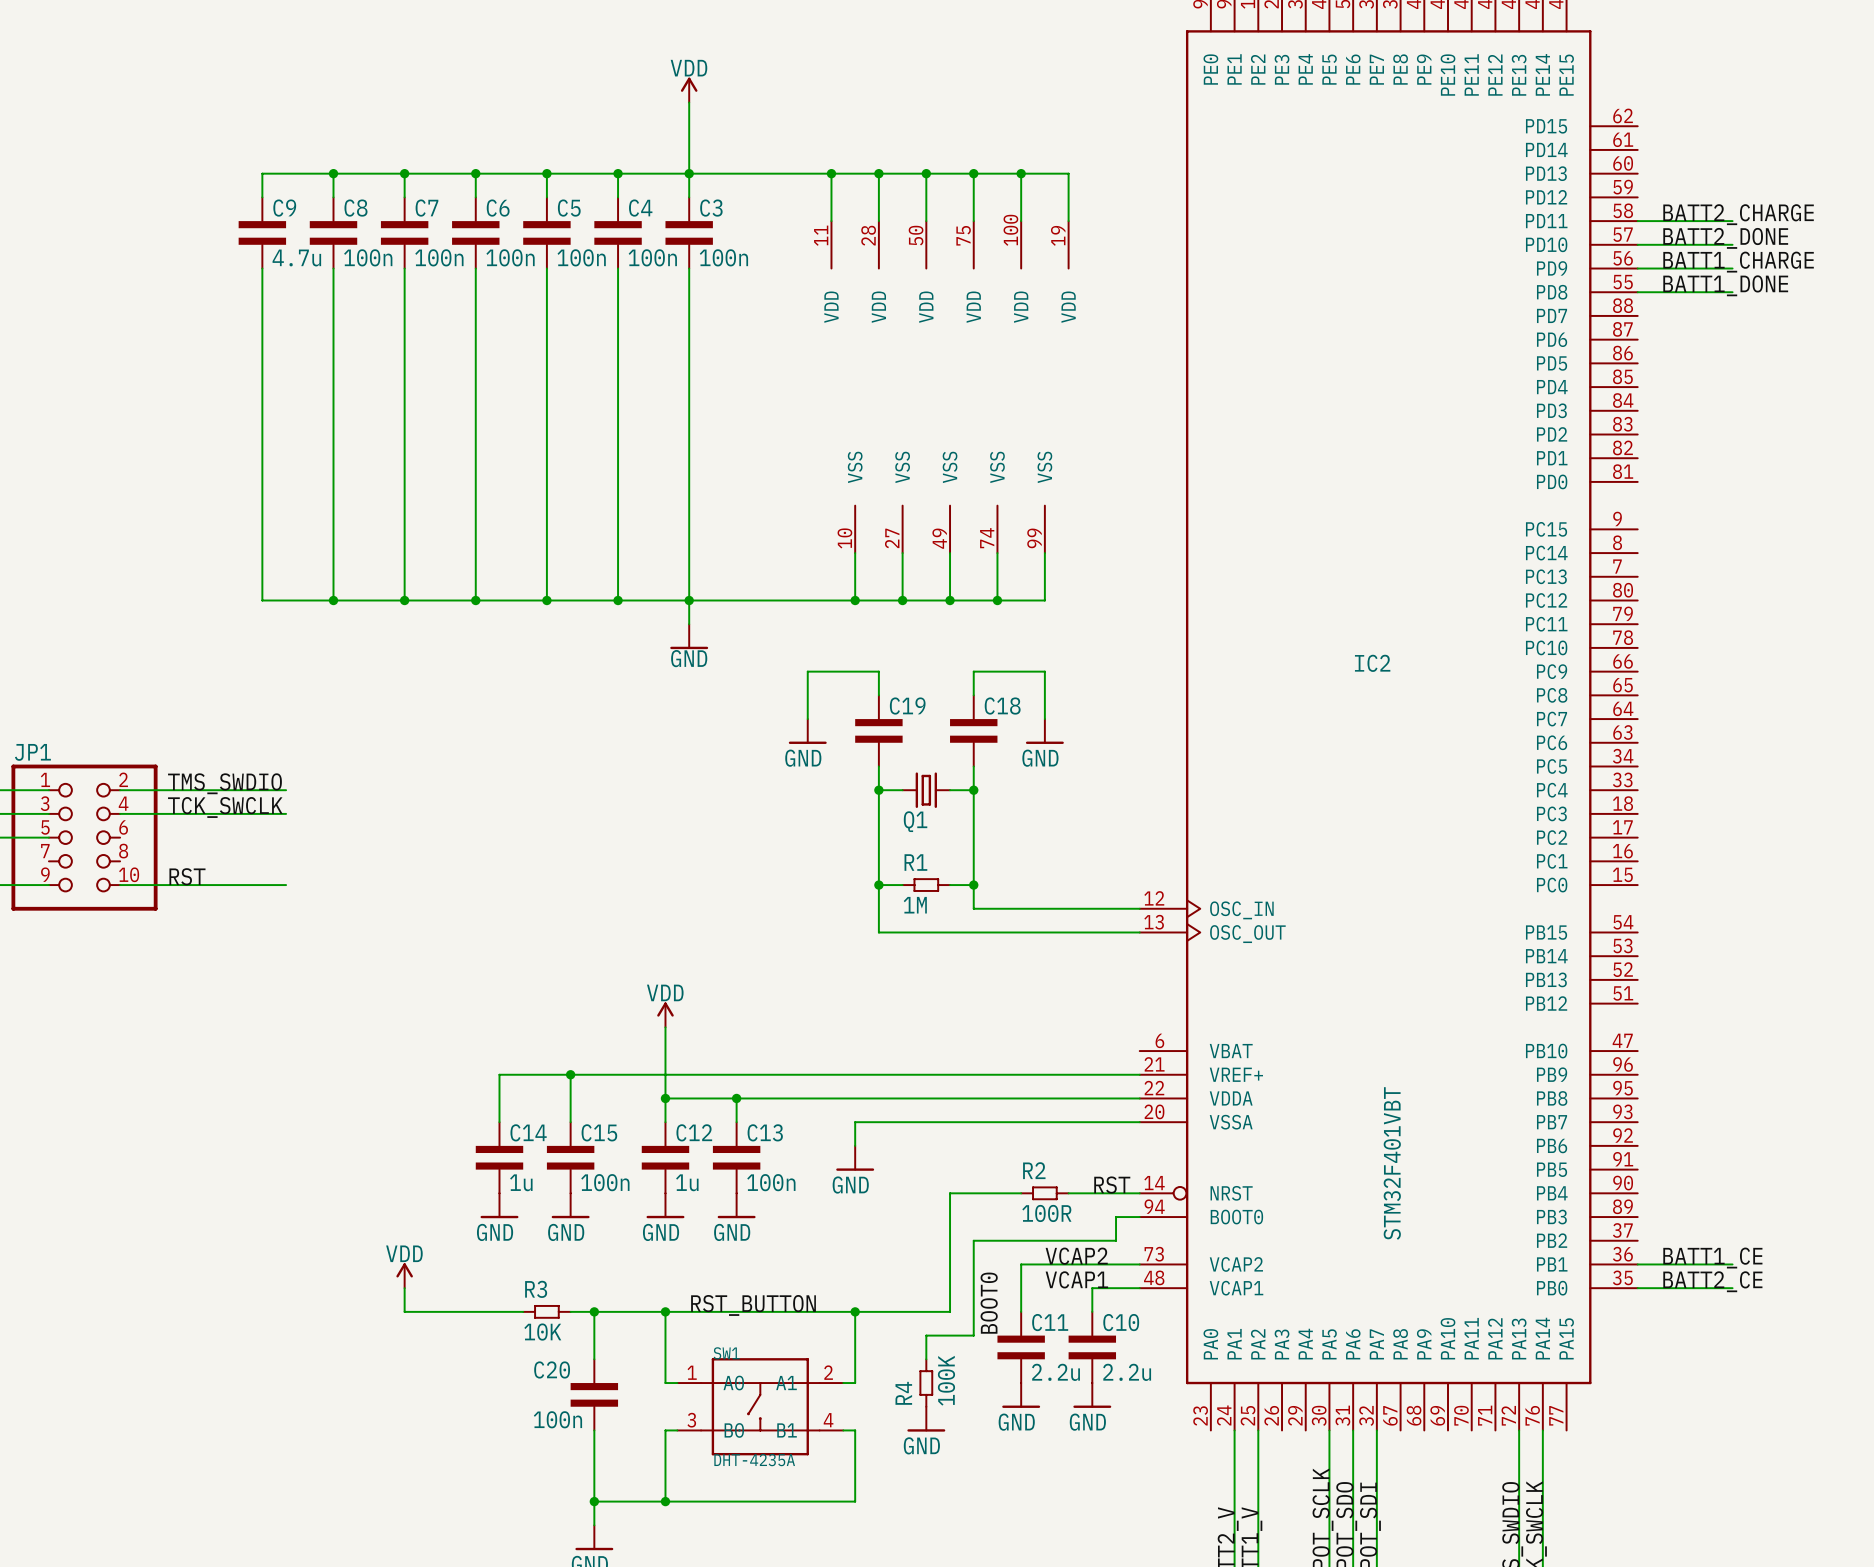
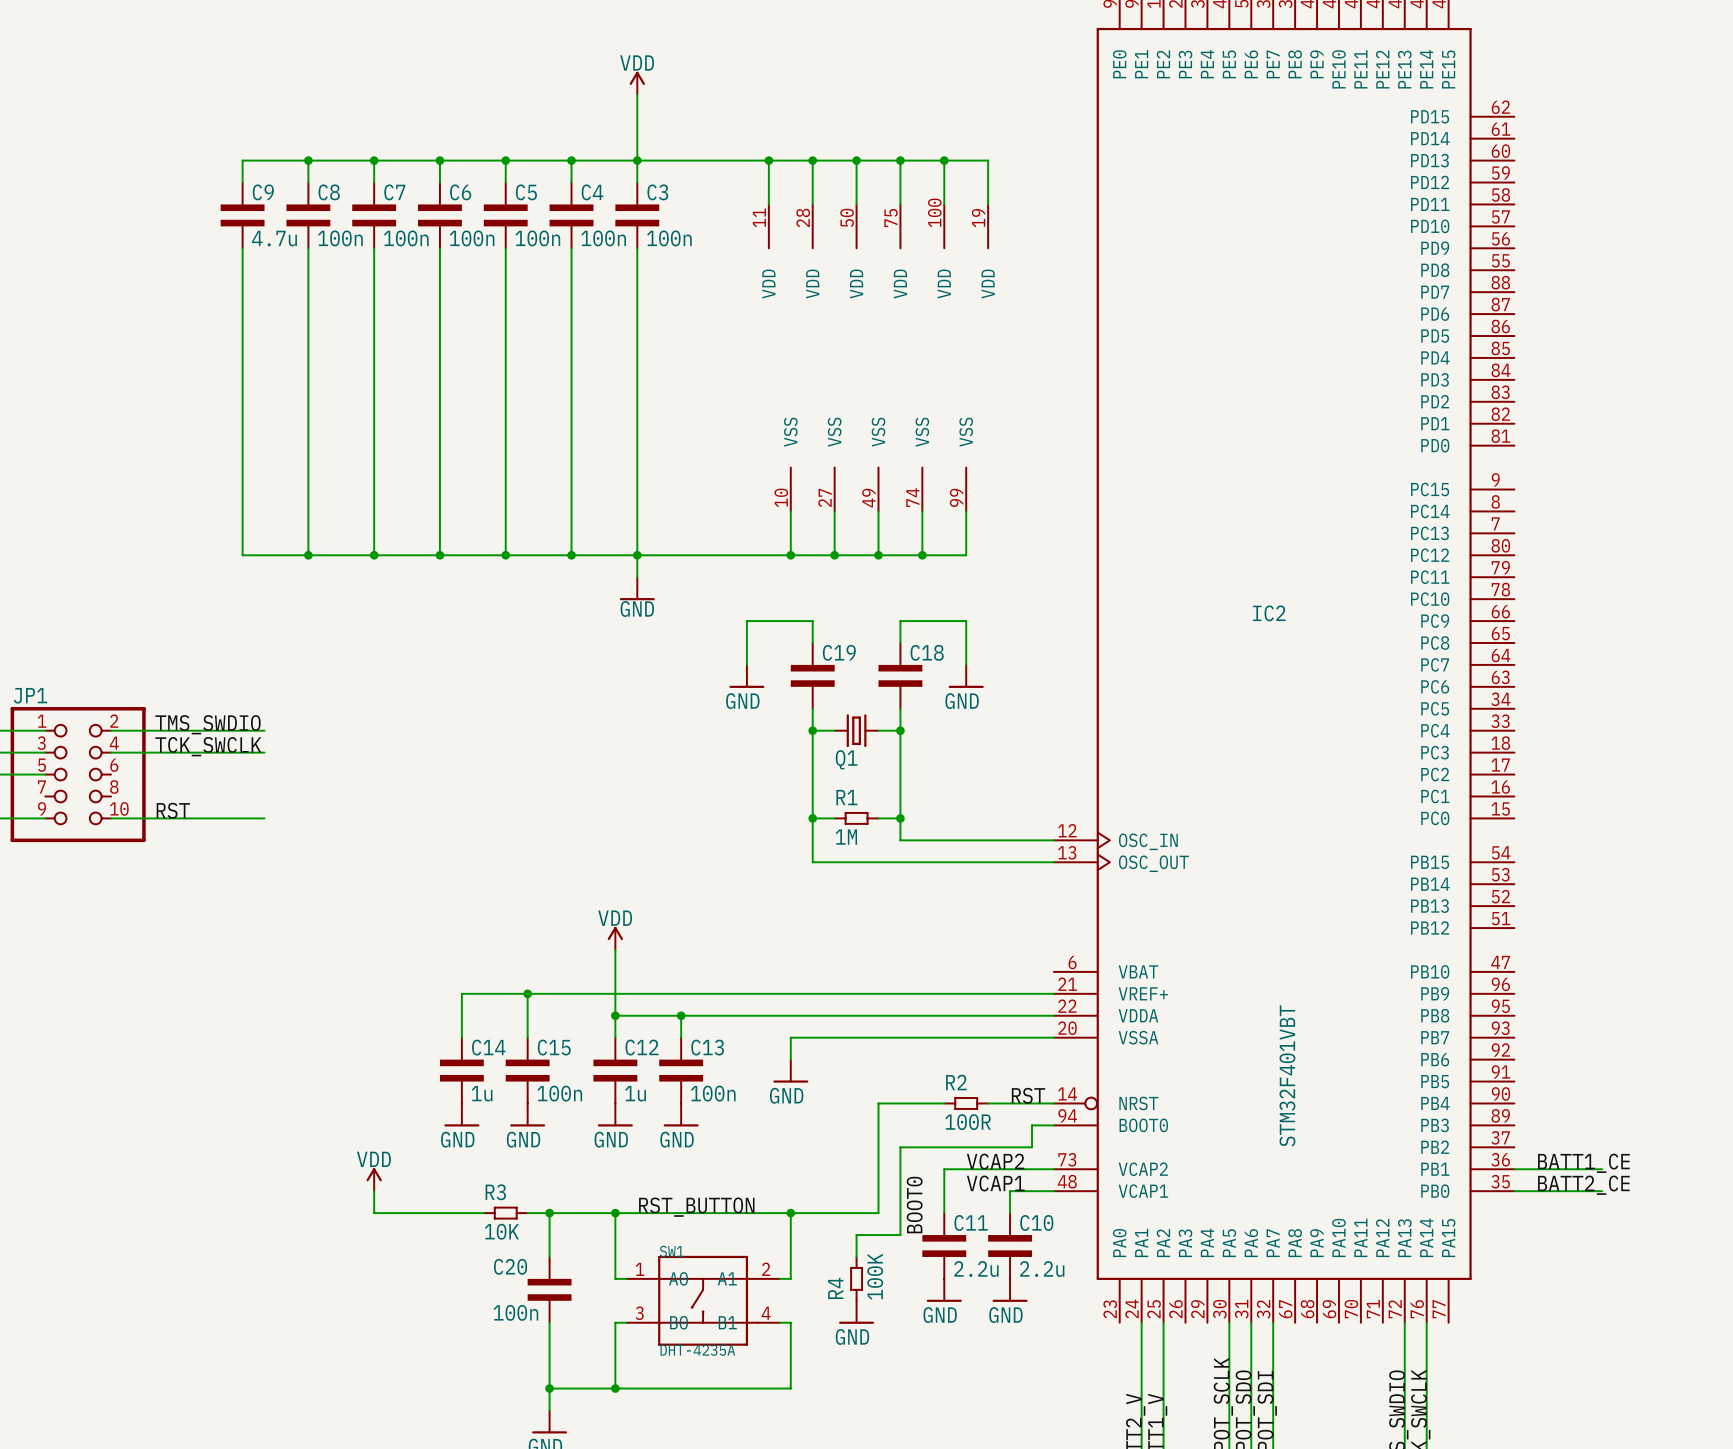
label: BATT2_CHARGE (1738, 214) -> none
wire: (1637, 221) (1732, 221) -> none
label: BATT2_DONE (1725, 238) -> none
wire: (1637, 244) (1732, 244) -> none
label: BATT1_CHARGE (1738, 262) -> none
wire: (1637, 268) (1732, 268) -> none
label: BATT1_DONE (1725, 285) -> none
wire: (1637, 292) (1732, 292) -> none

